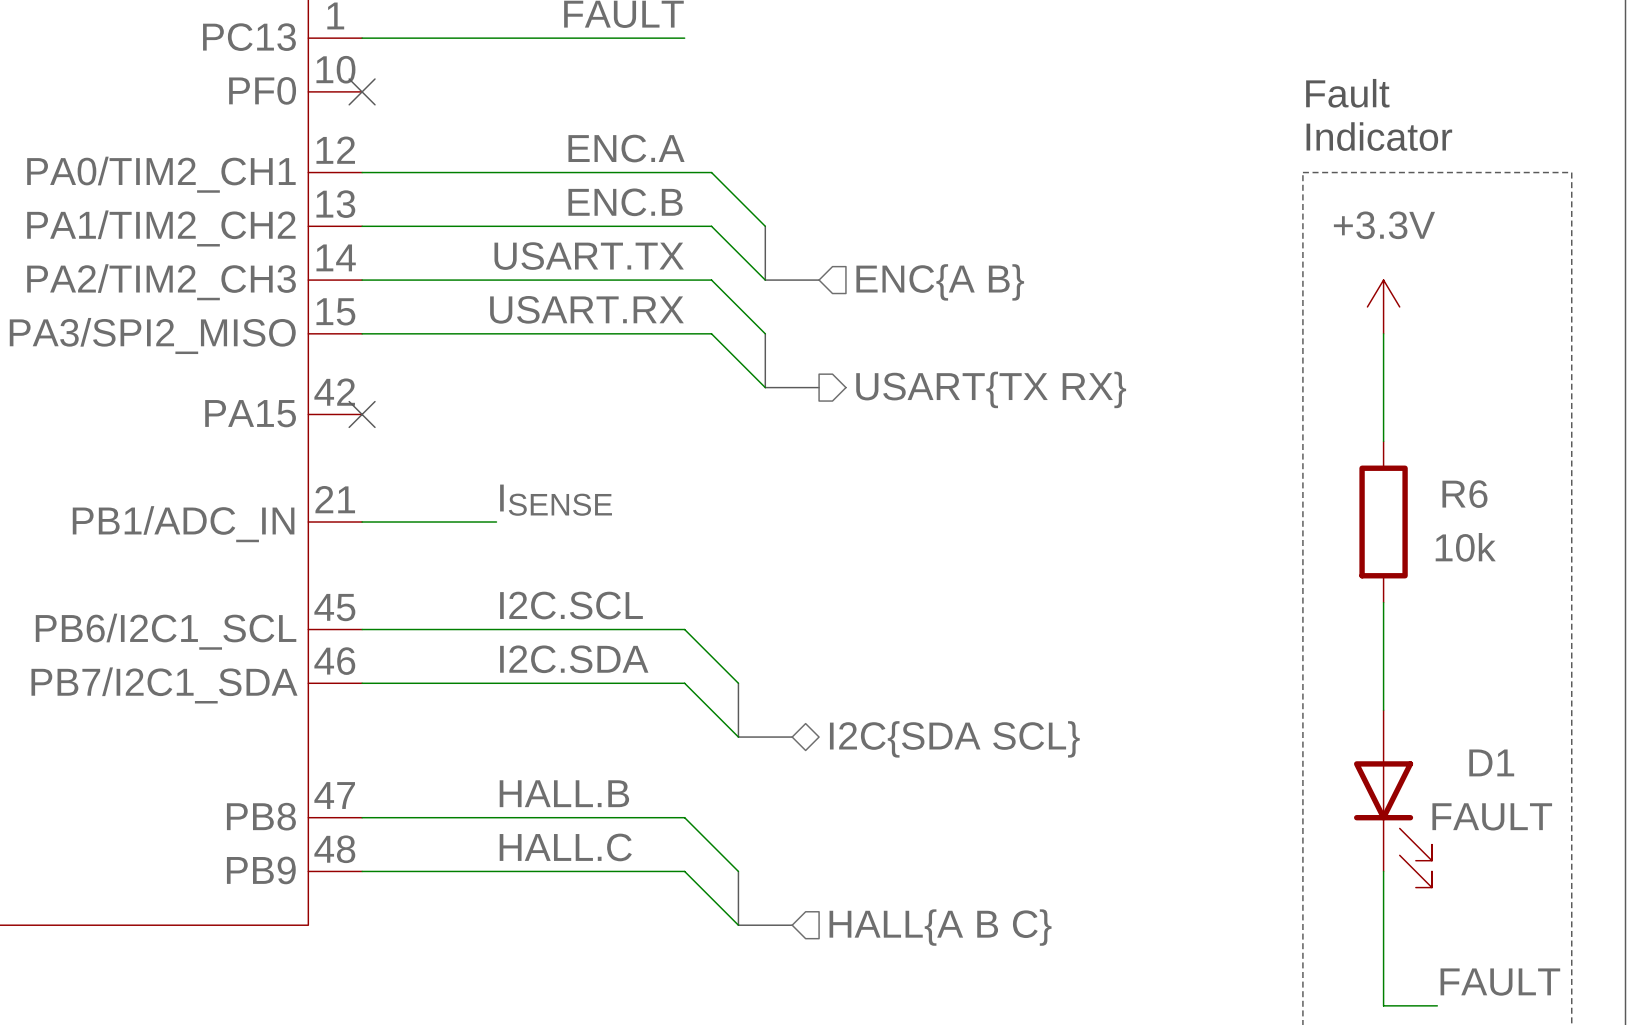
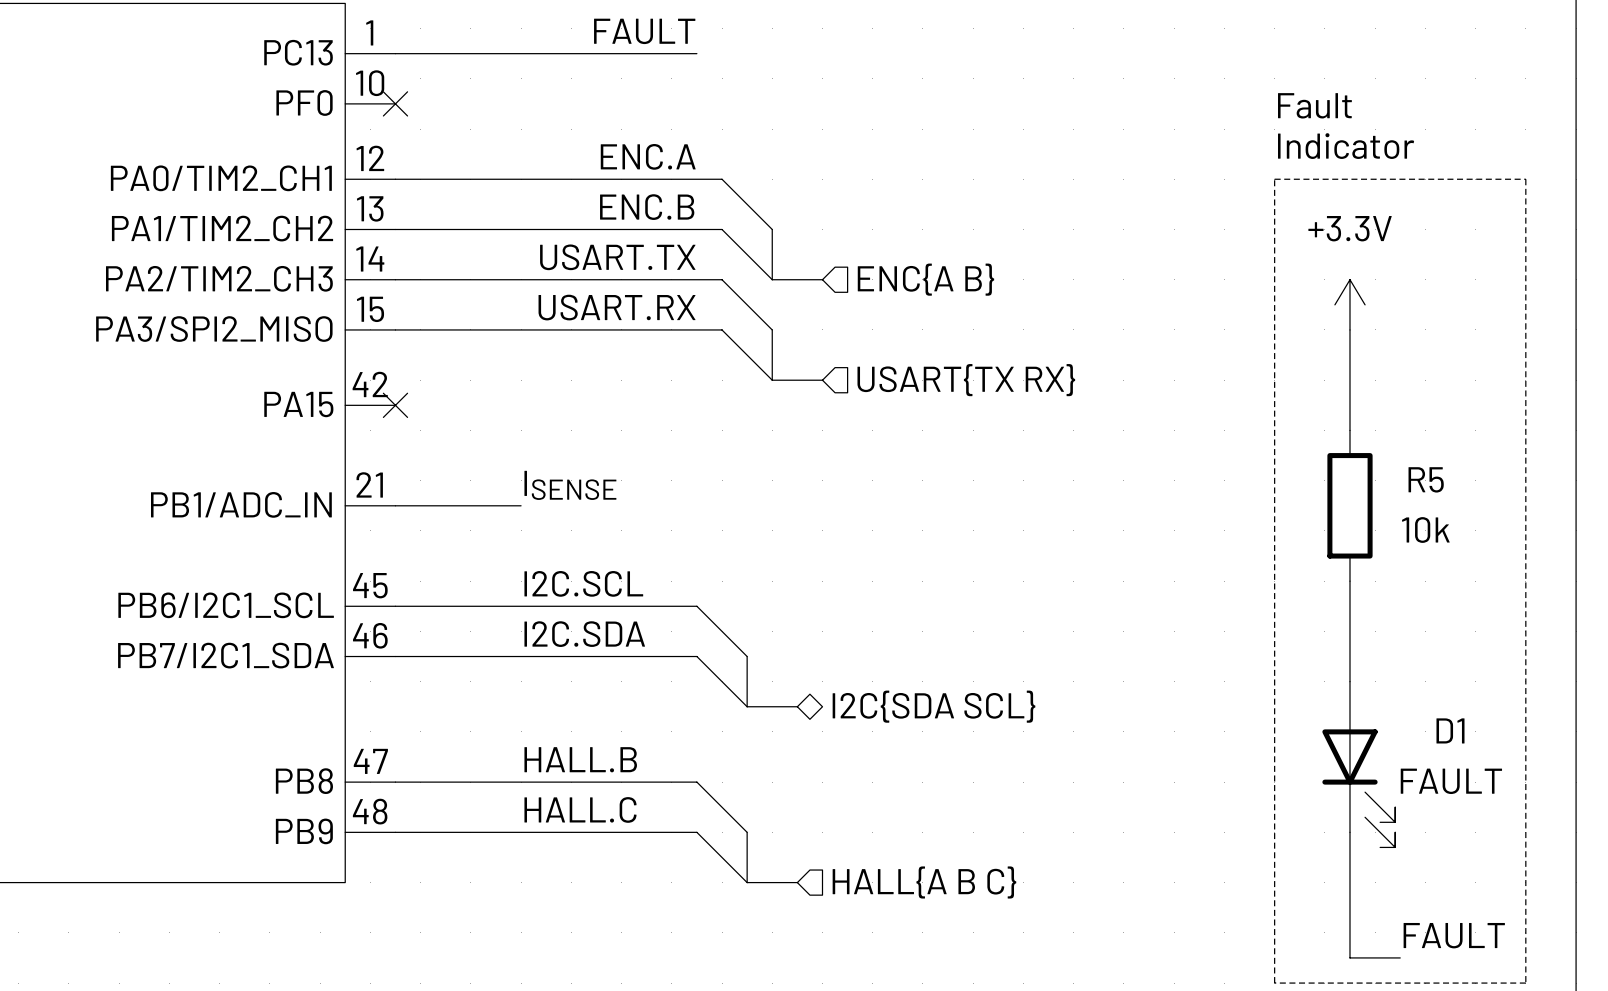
hierarchical label shape: output (991, 389) -> input (966, 380)
R6 name: R6 (1464, 494) -> R5 (1426, 479)

